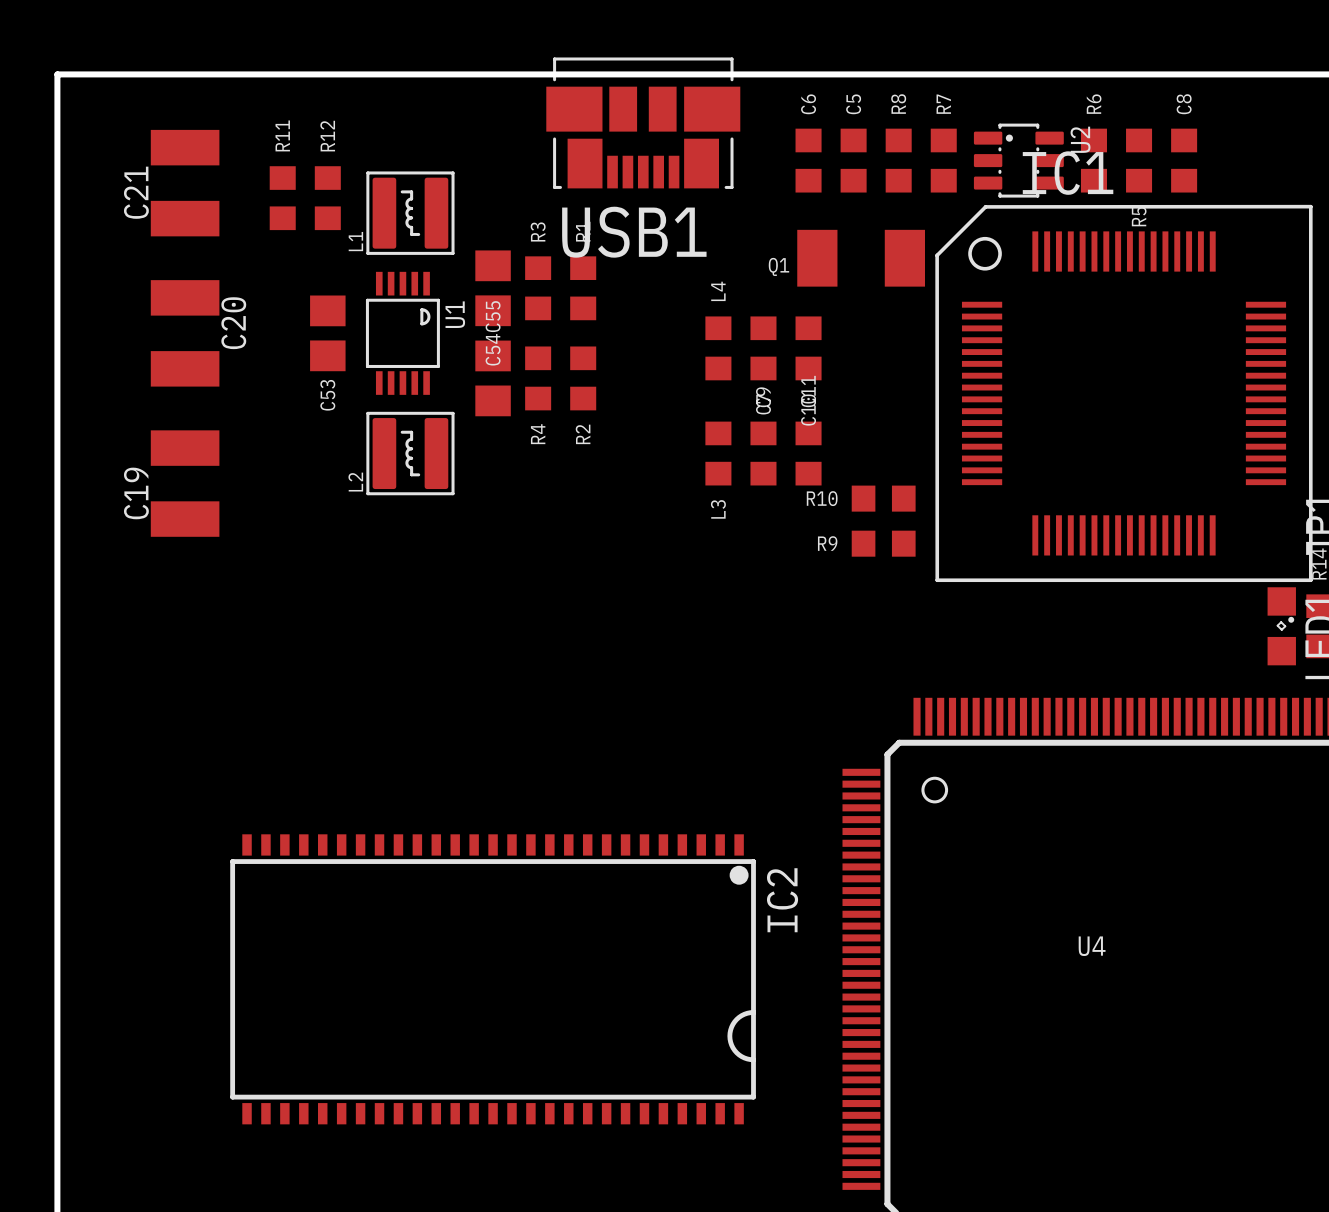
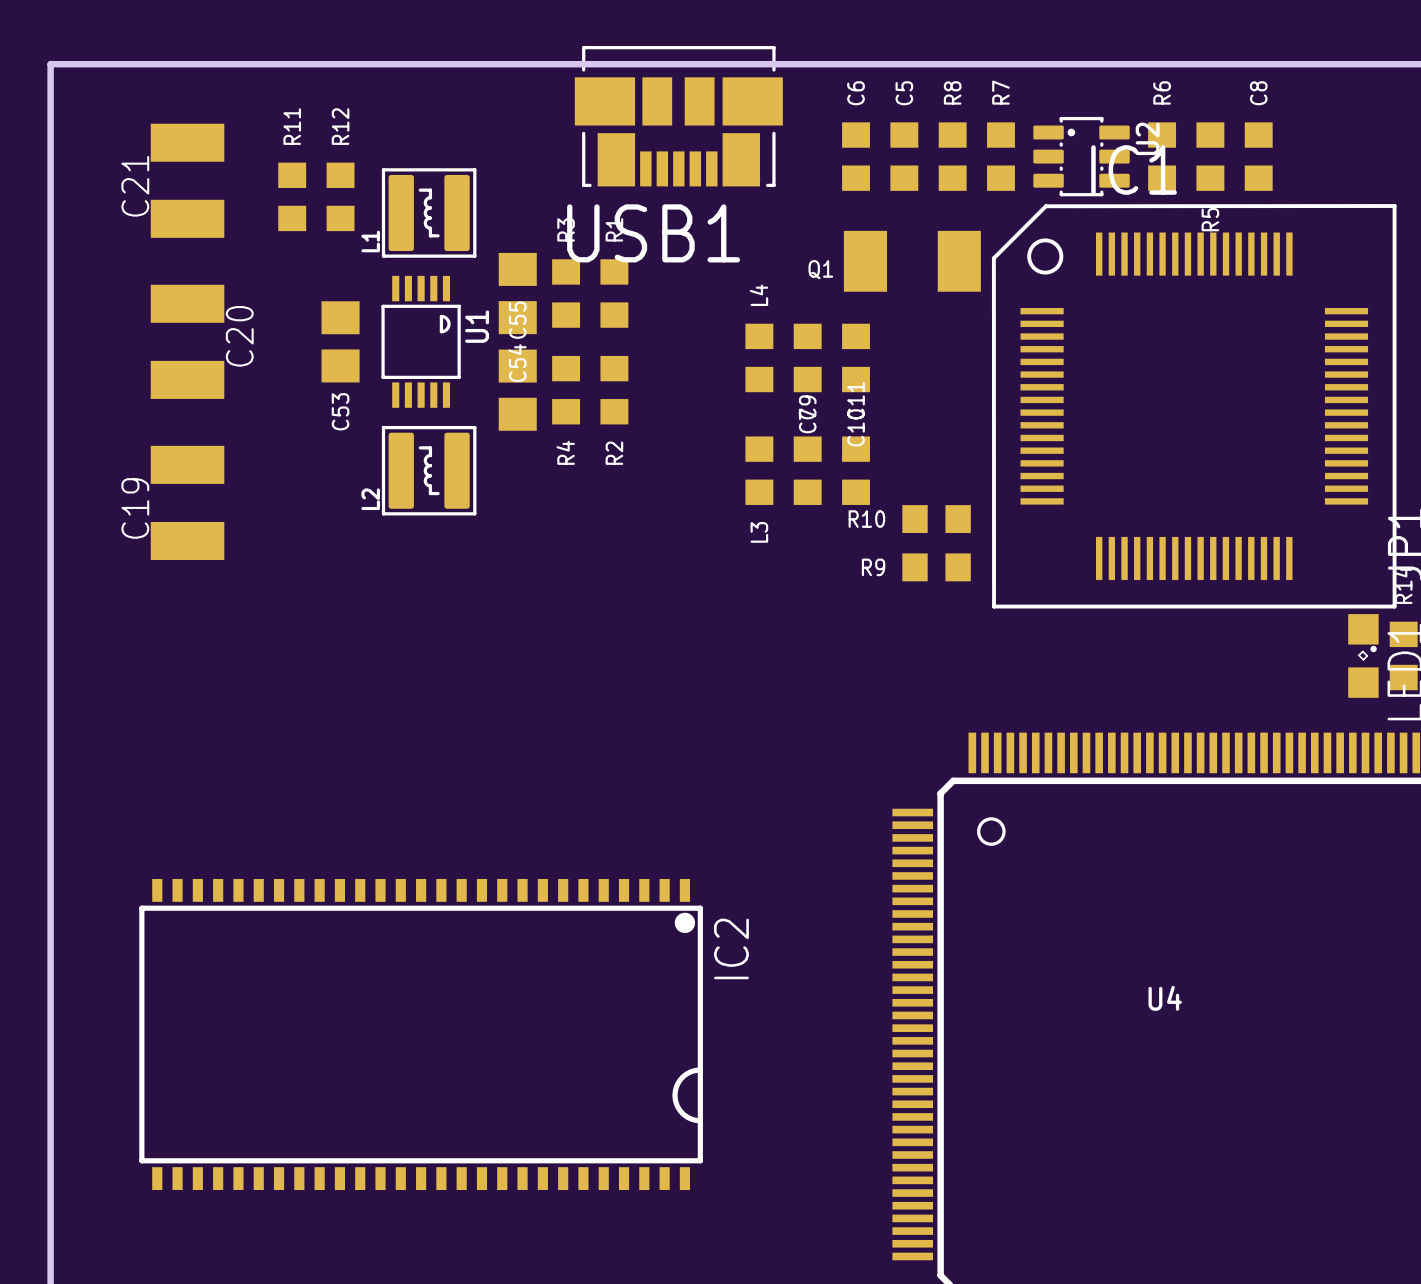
IC2 position: (493, 979) -> (421, 1034)

